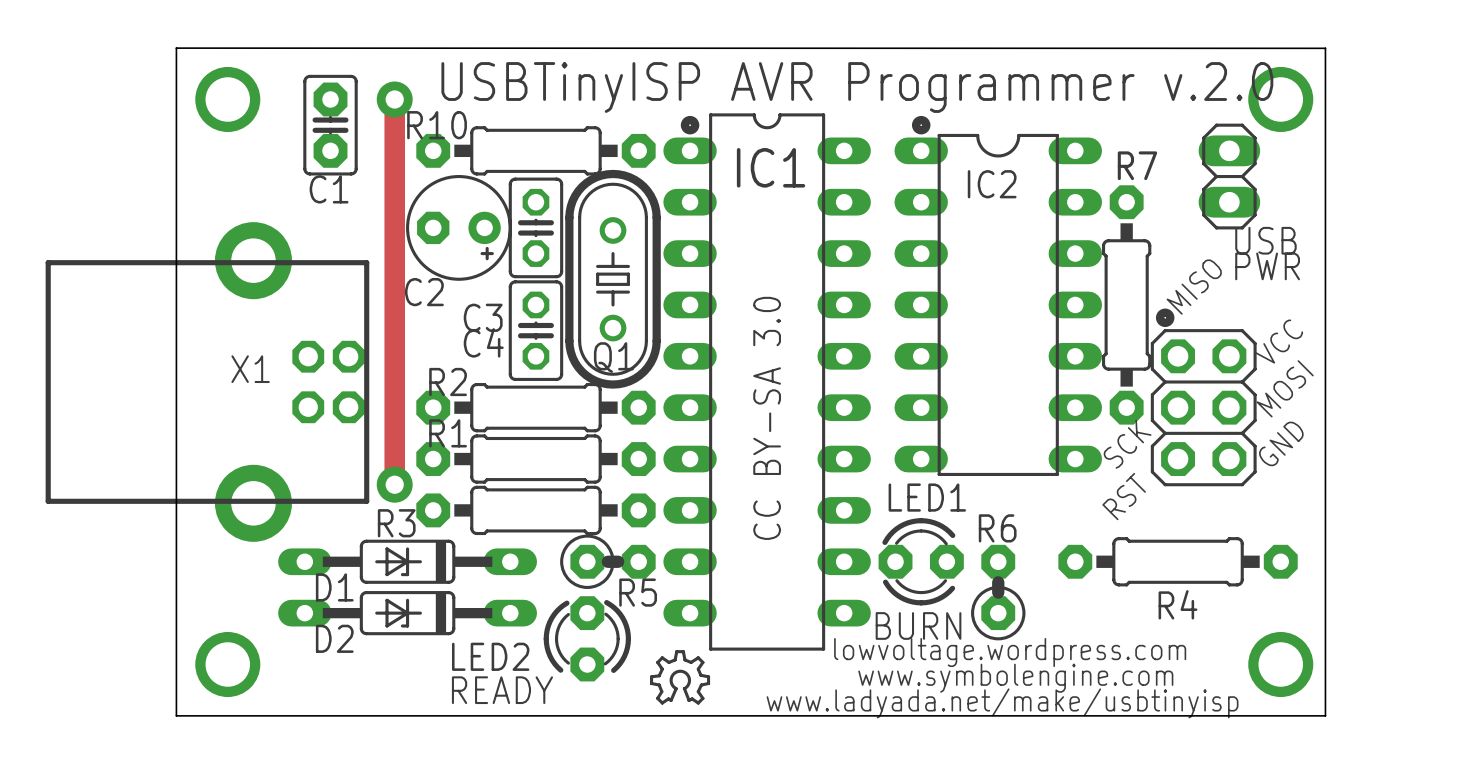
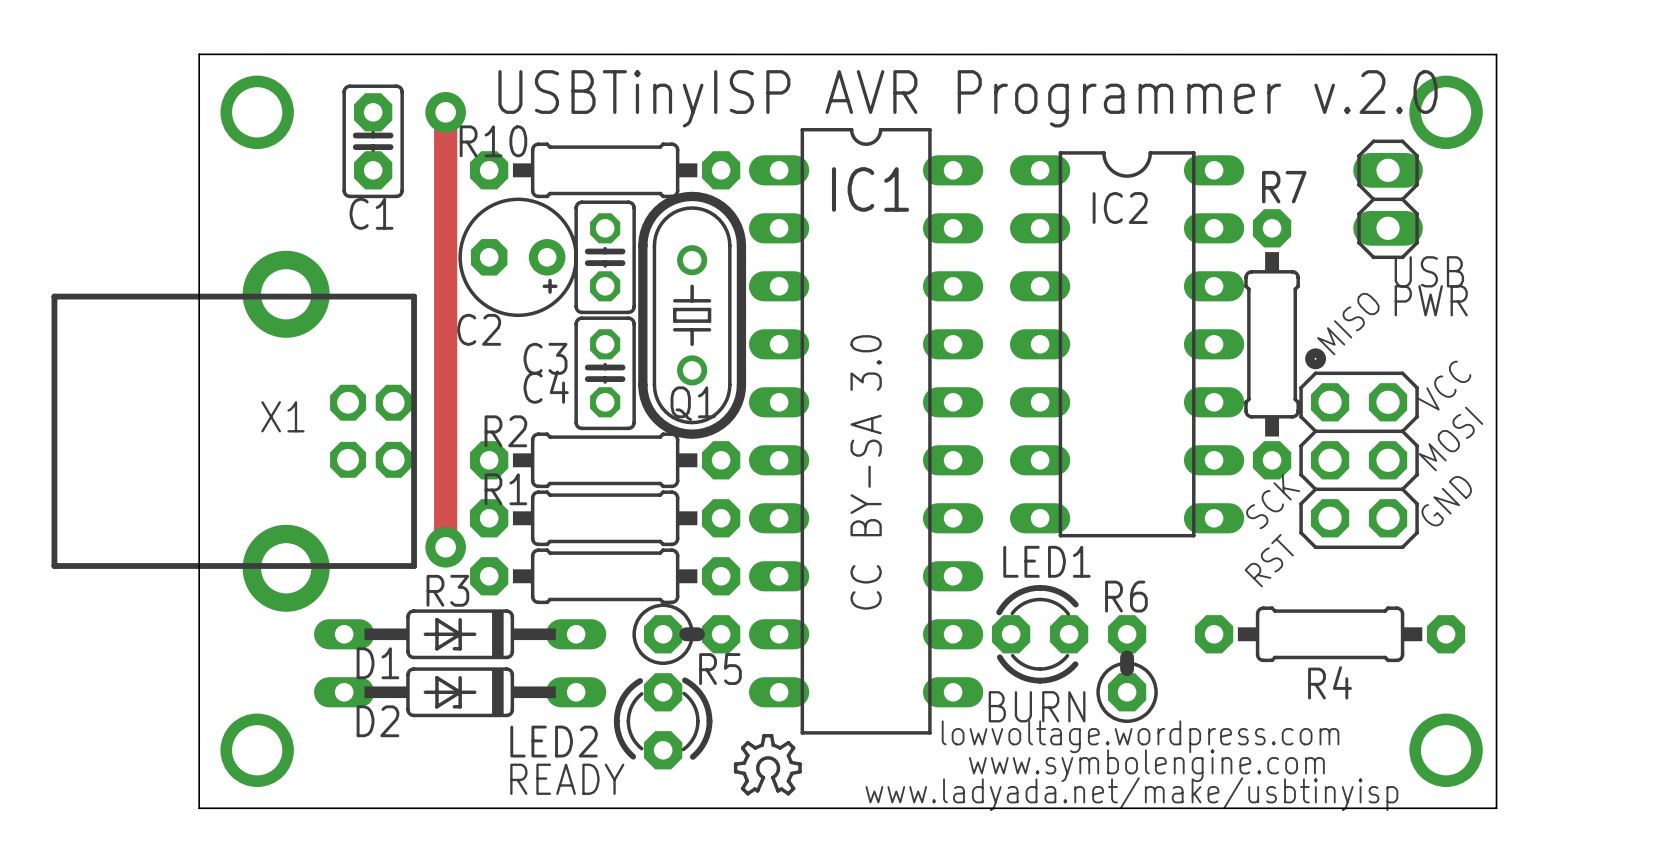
drawing: [680, 115, 700, 135] -> none
drawing: [911, 115, 931, 135] -> none

